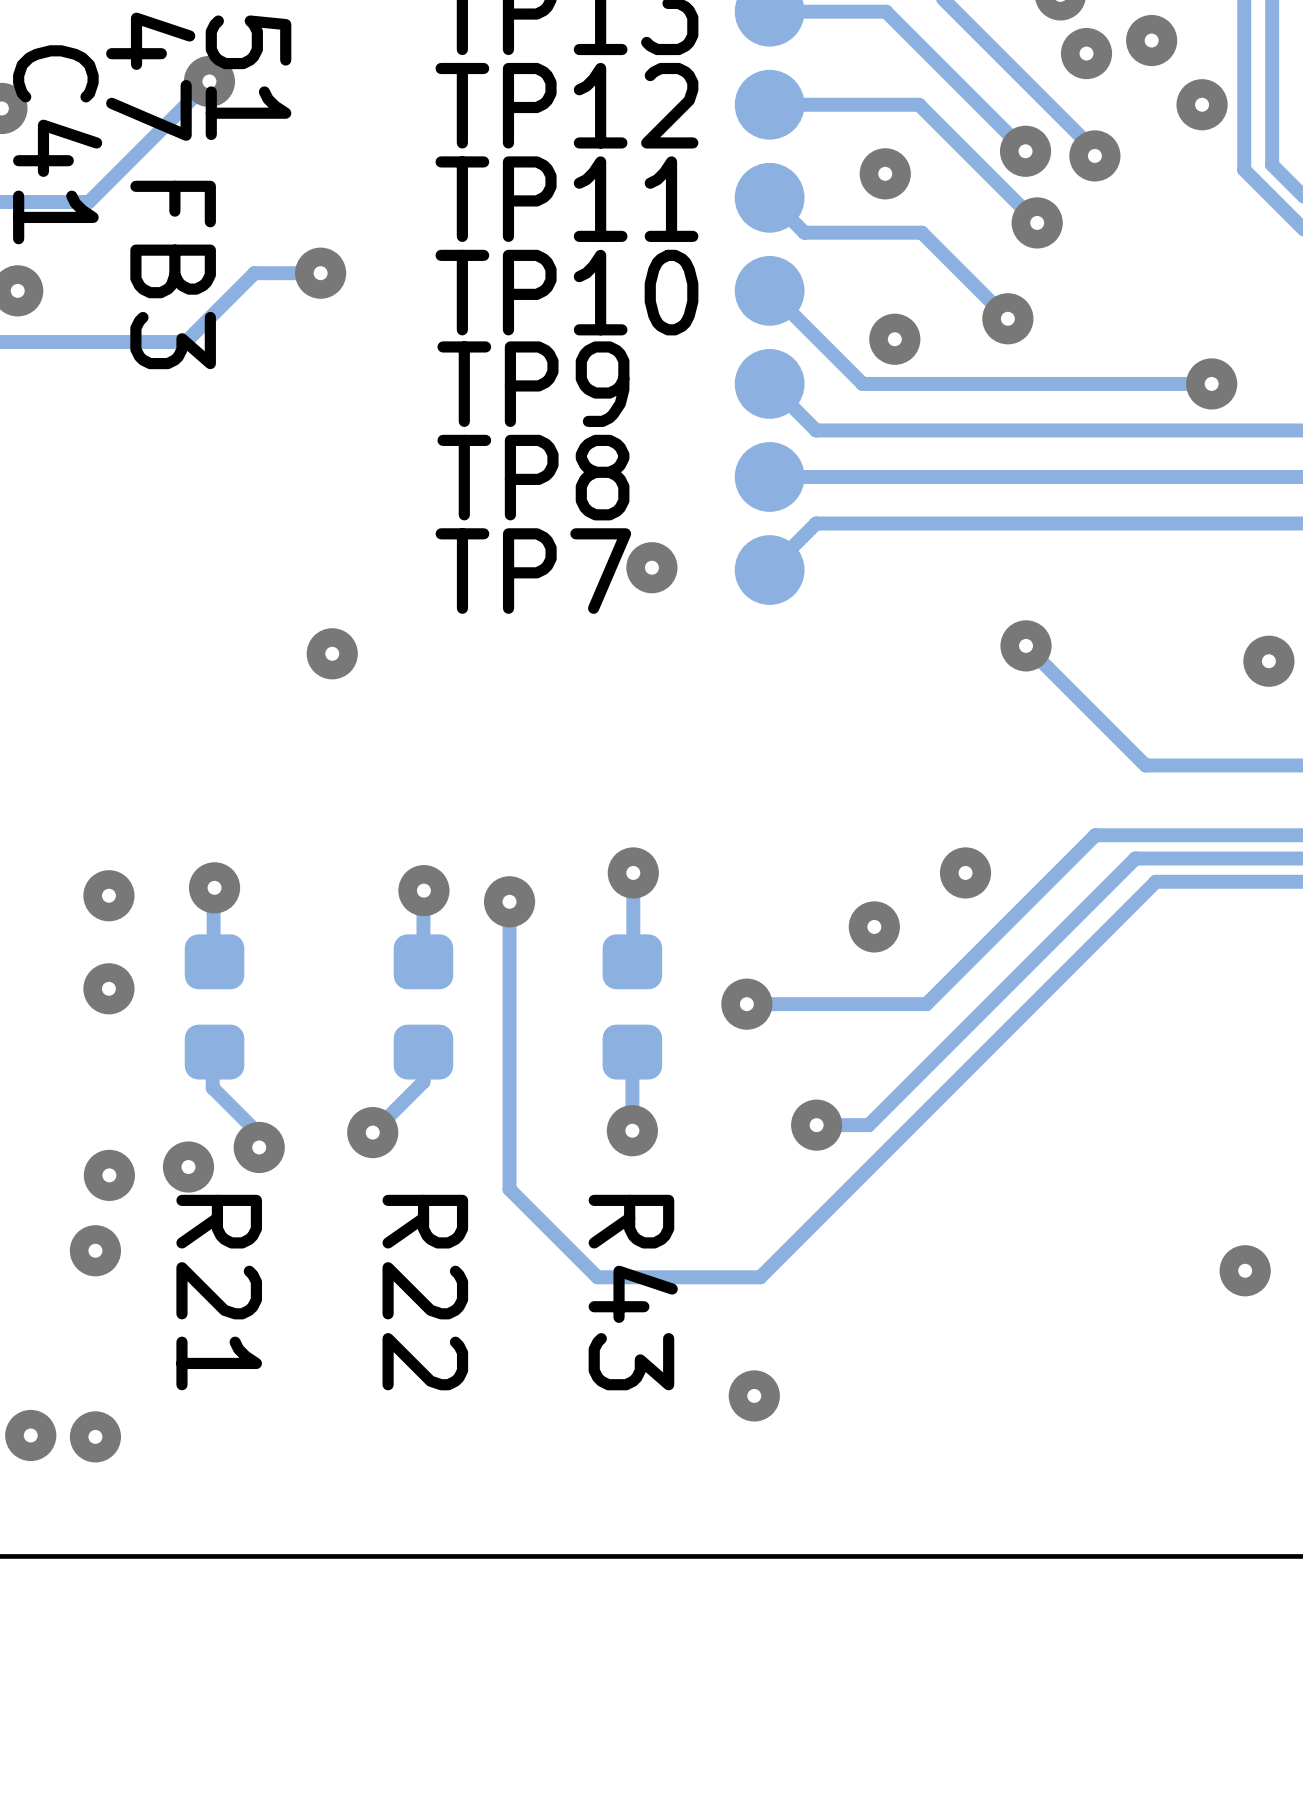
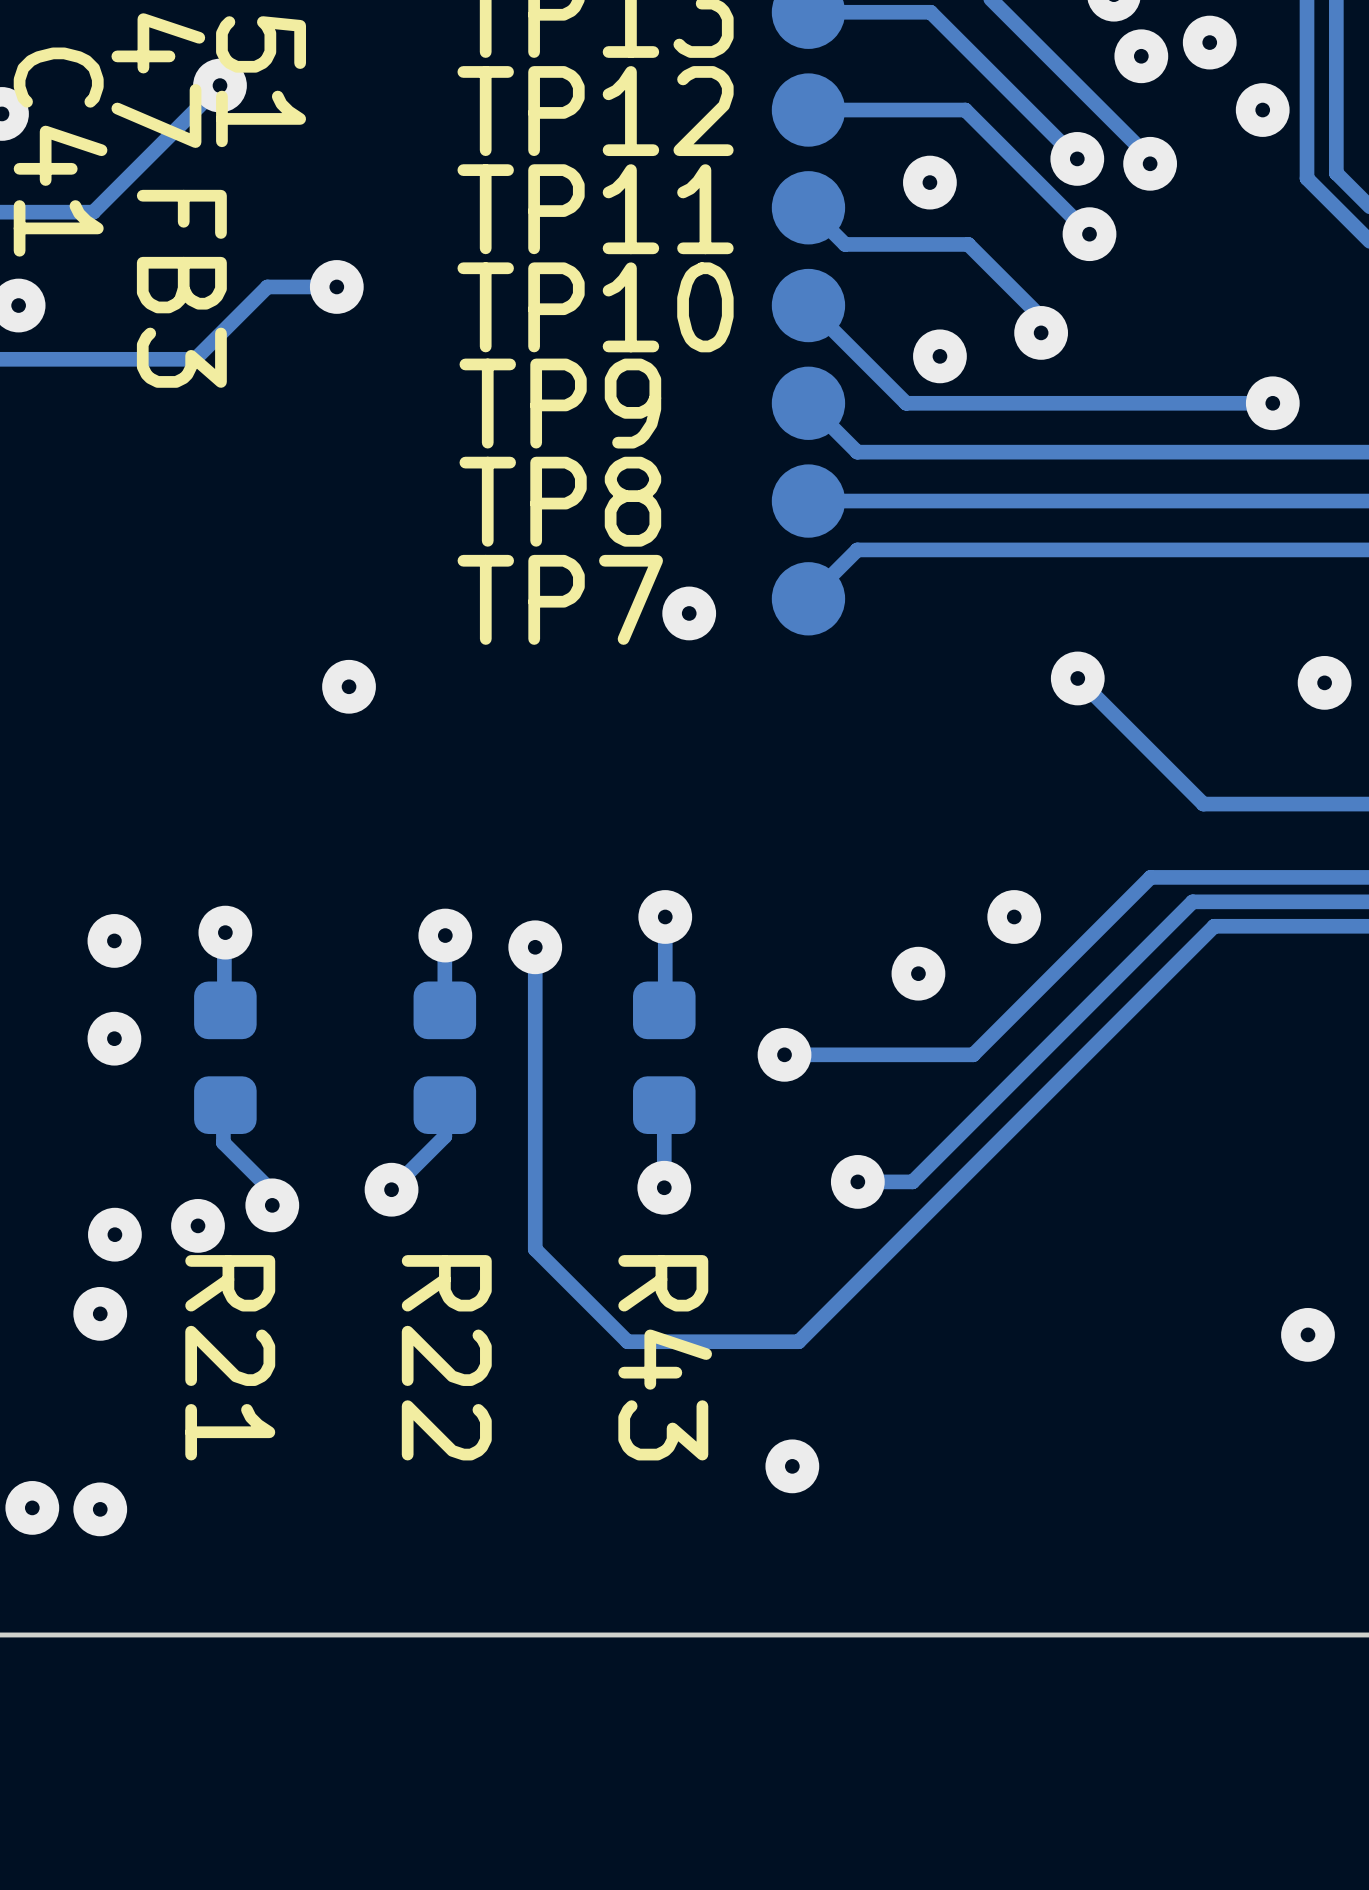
via position: (1007, 318) -> (1041, 332)
via position: (651, 567) -> (689, 613)
via position: (1268, 661) -> (1324, 682)

